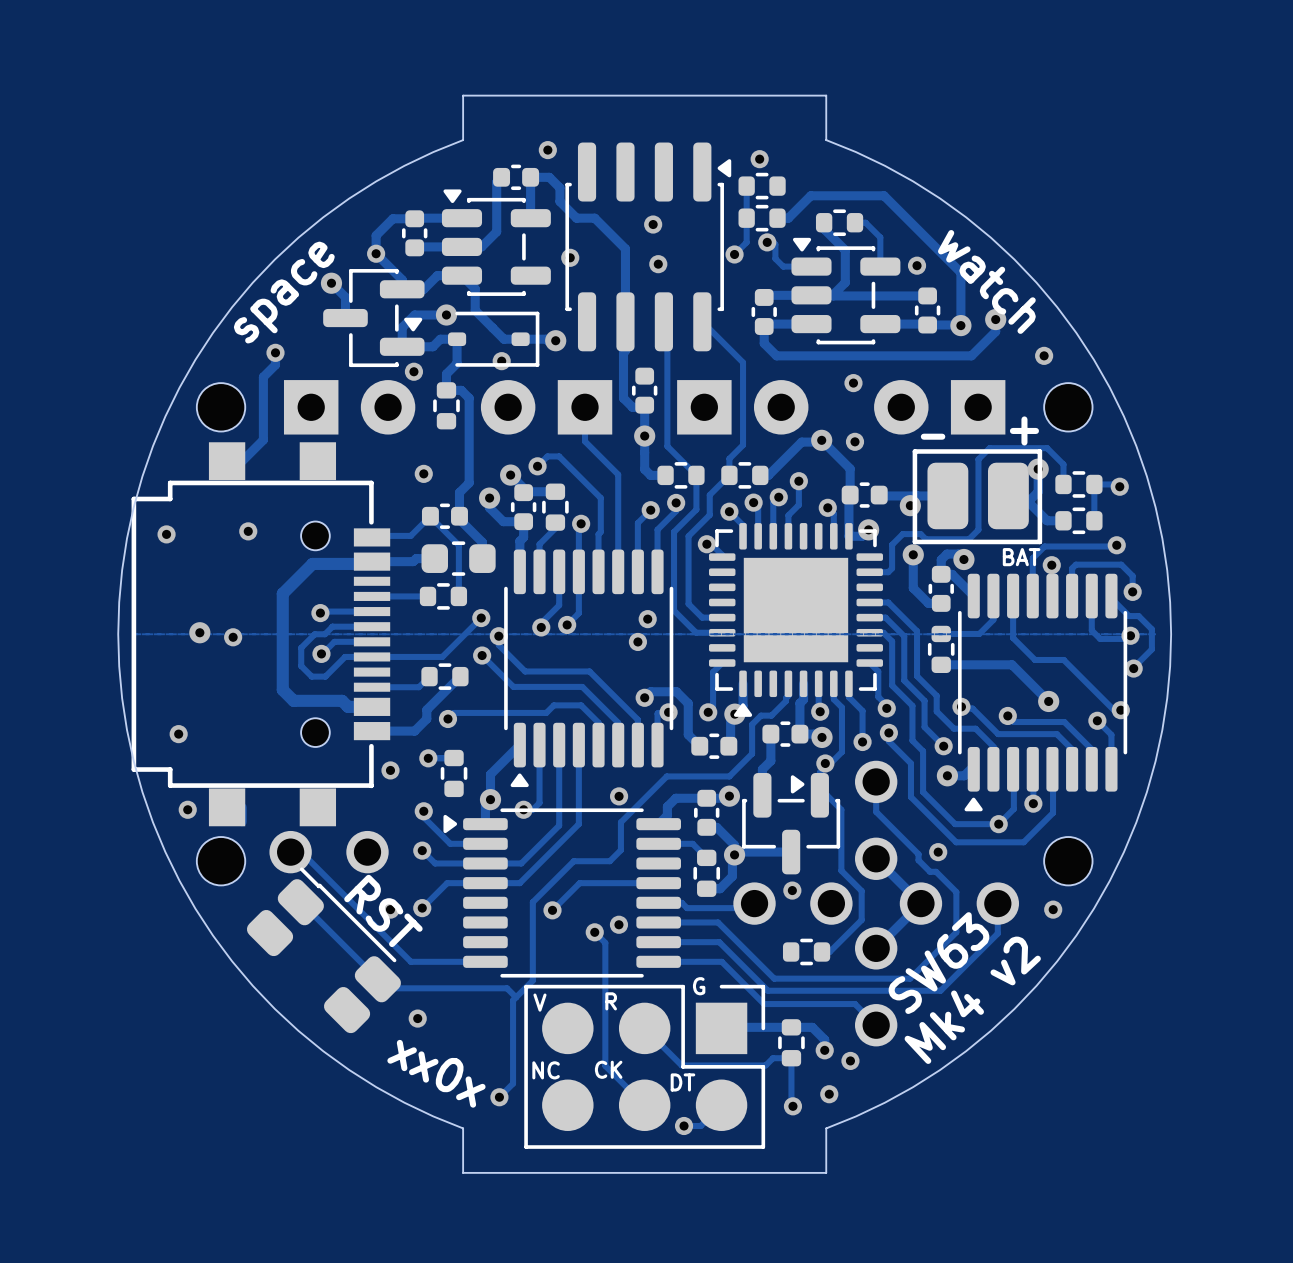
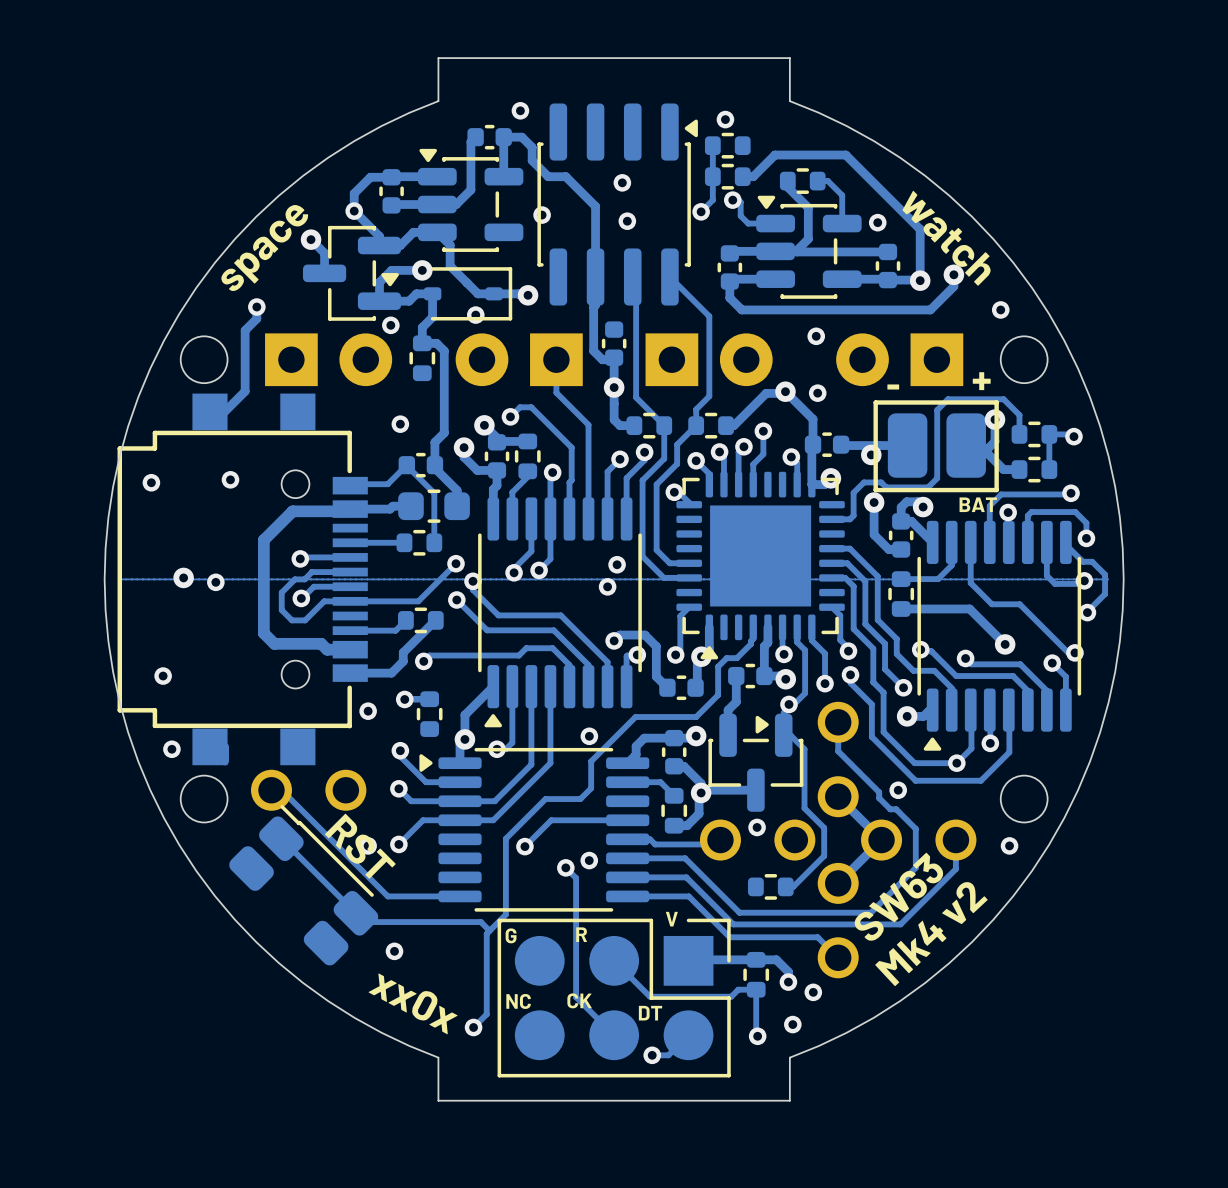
text: G (699, 986) -> V (671, 919)
text: V (539, 1002) -> G (511, 935)

